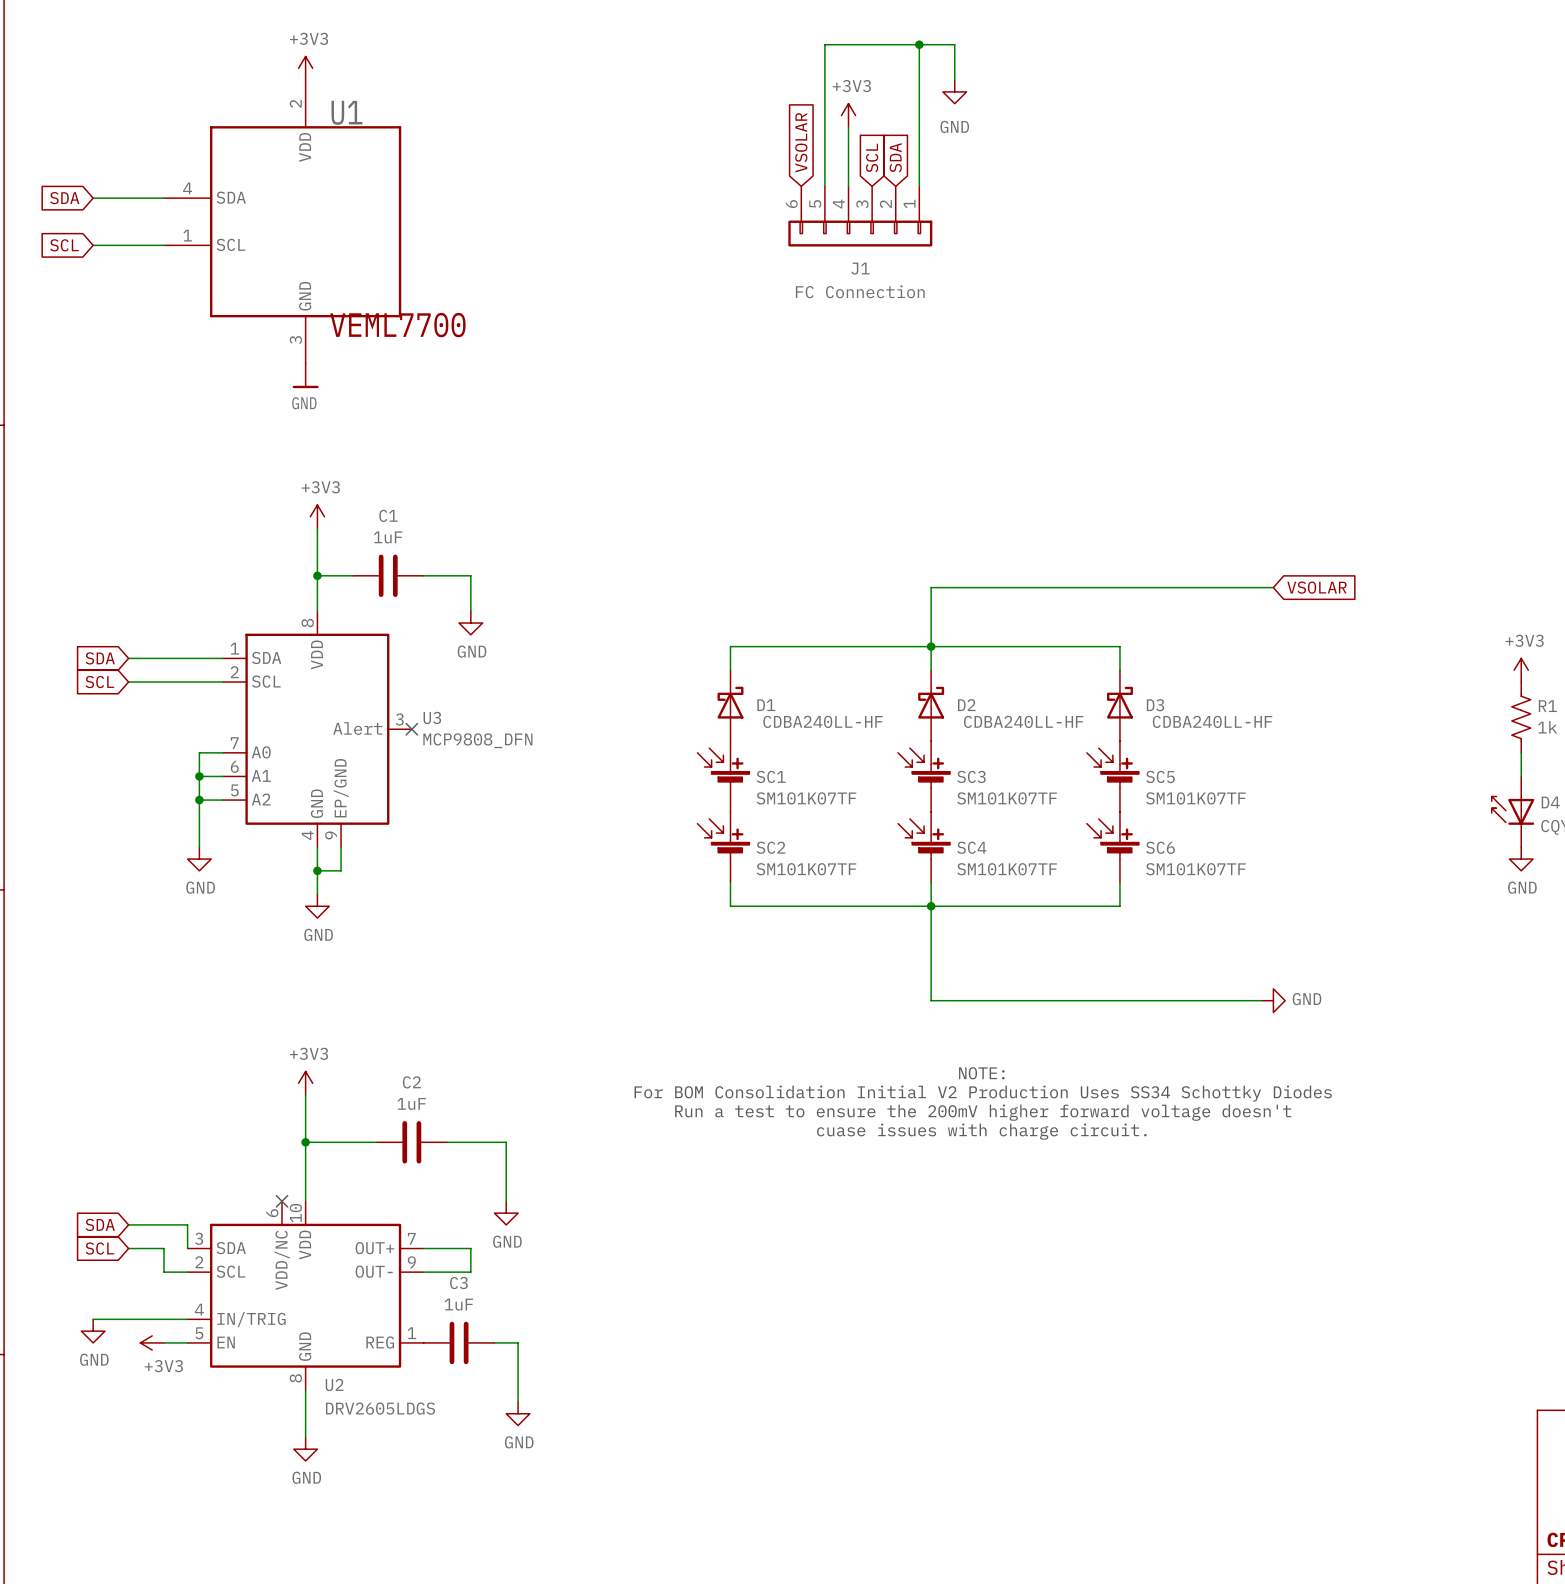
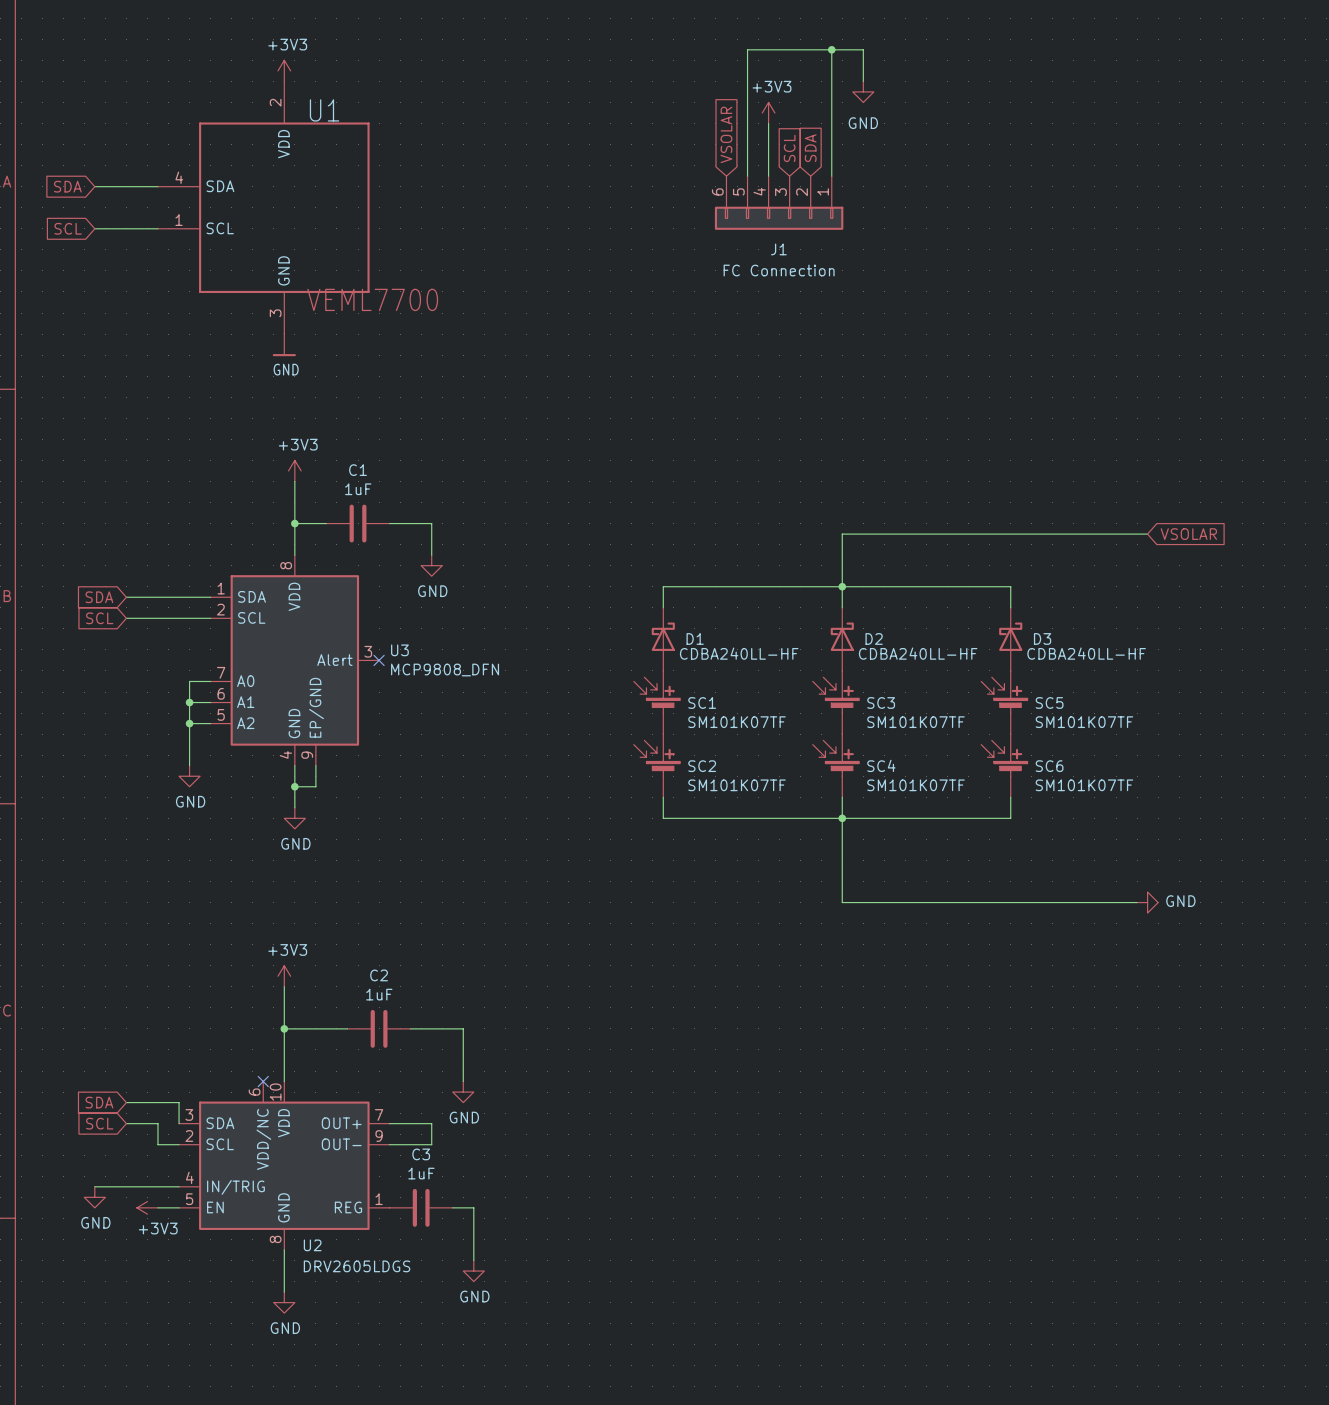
text: NOTE: (981, 1073) -> none
text: For BOM Consolidation Initial V2 Production Uses SS34 Schottky Diodes (983, 1093) -> none
text: Run a test to ensure the 200mV higher forward voltage doesn't (983, 1112) -> none
text: cuase issues with charge circuit. (981, 1131) -> none

